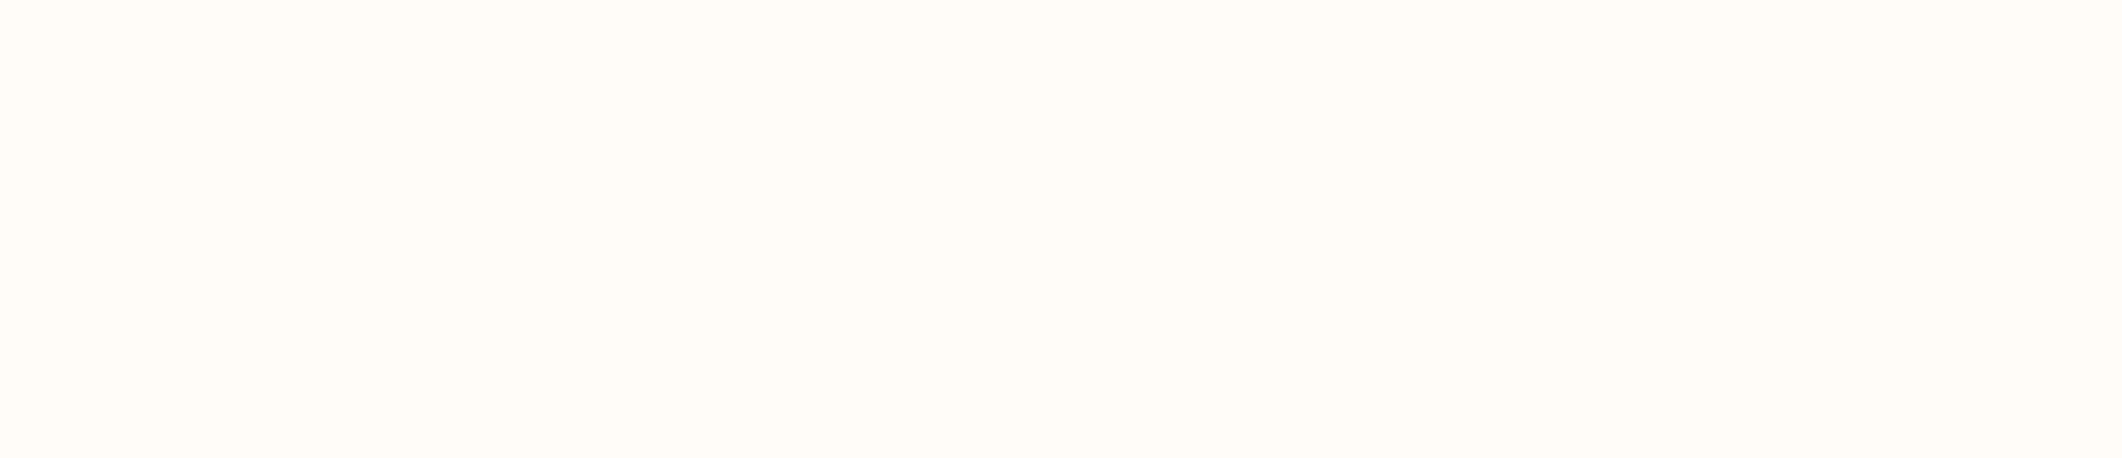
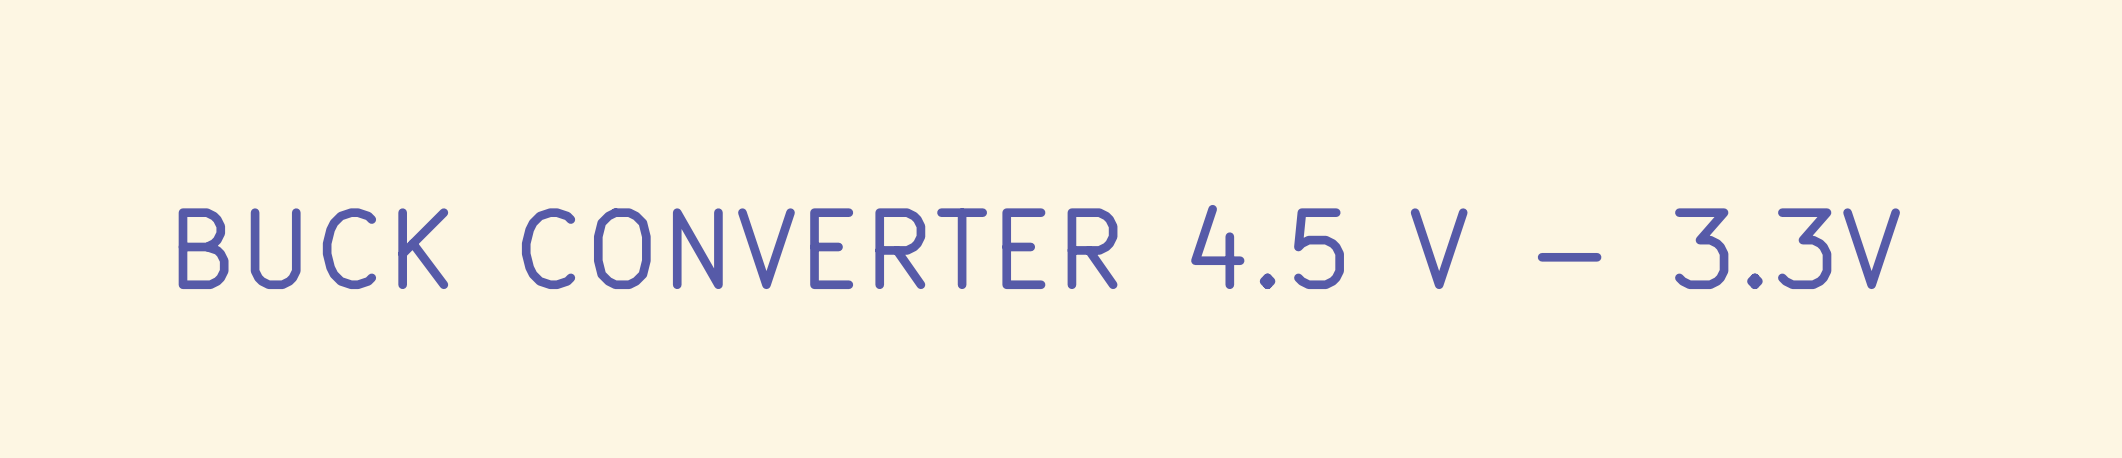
text: none -> BUCK CONVERTER 4.5 V - 3.3V (1039, 246)

